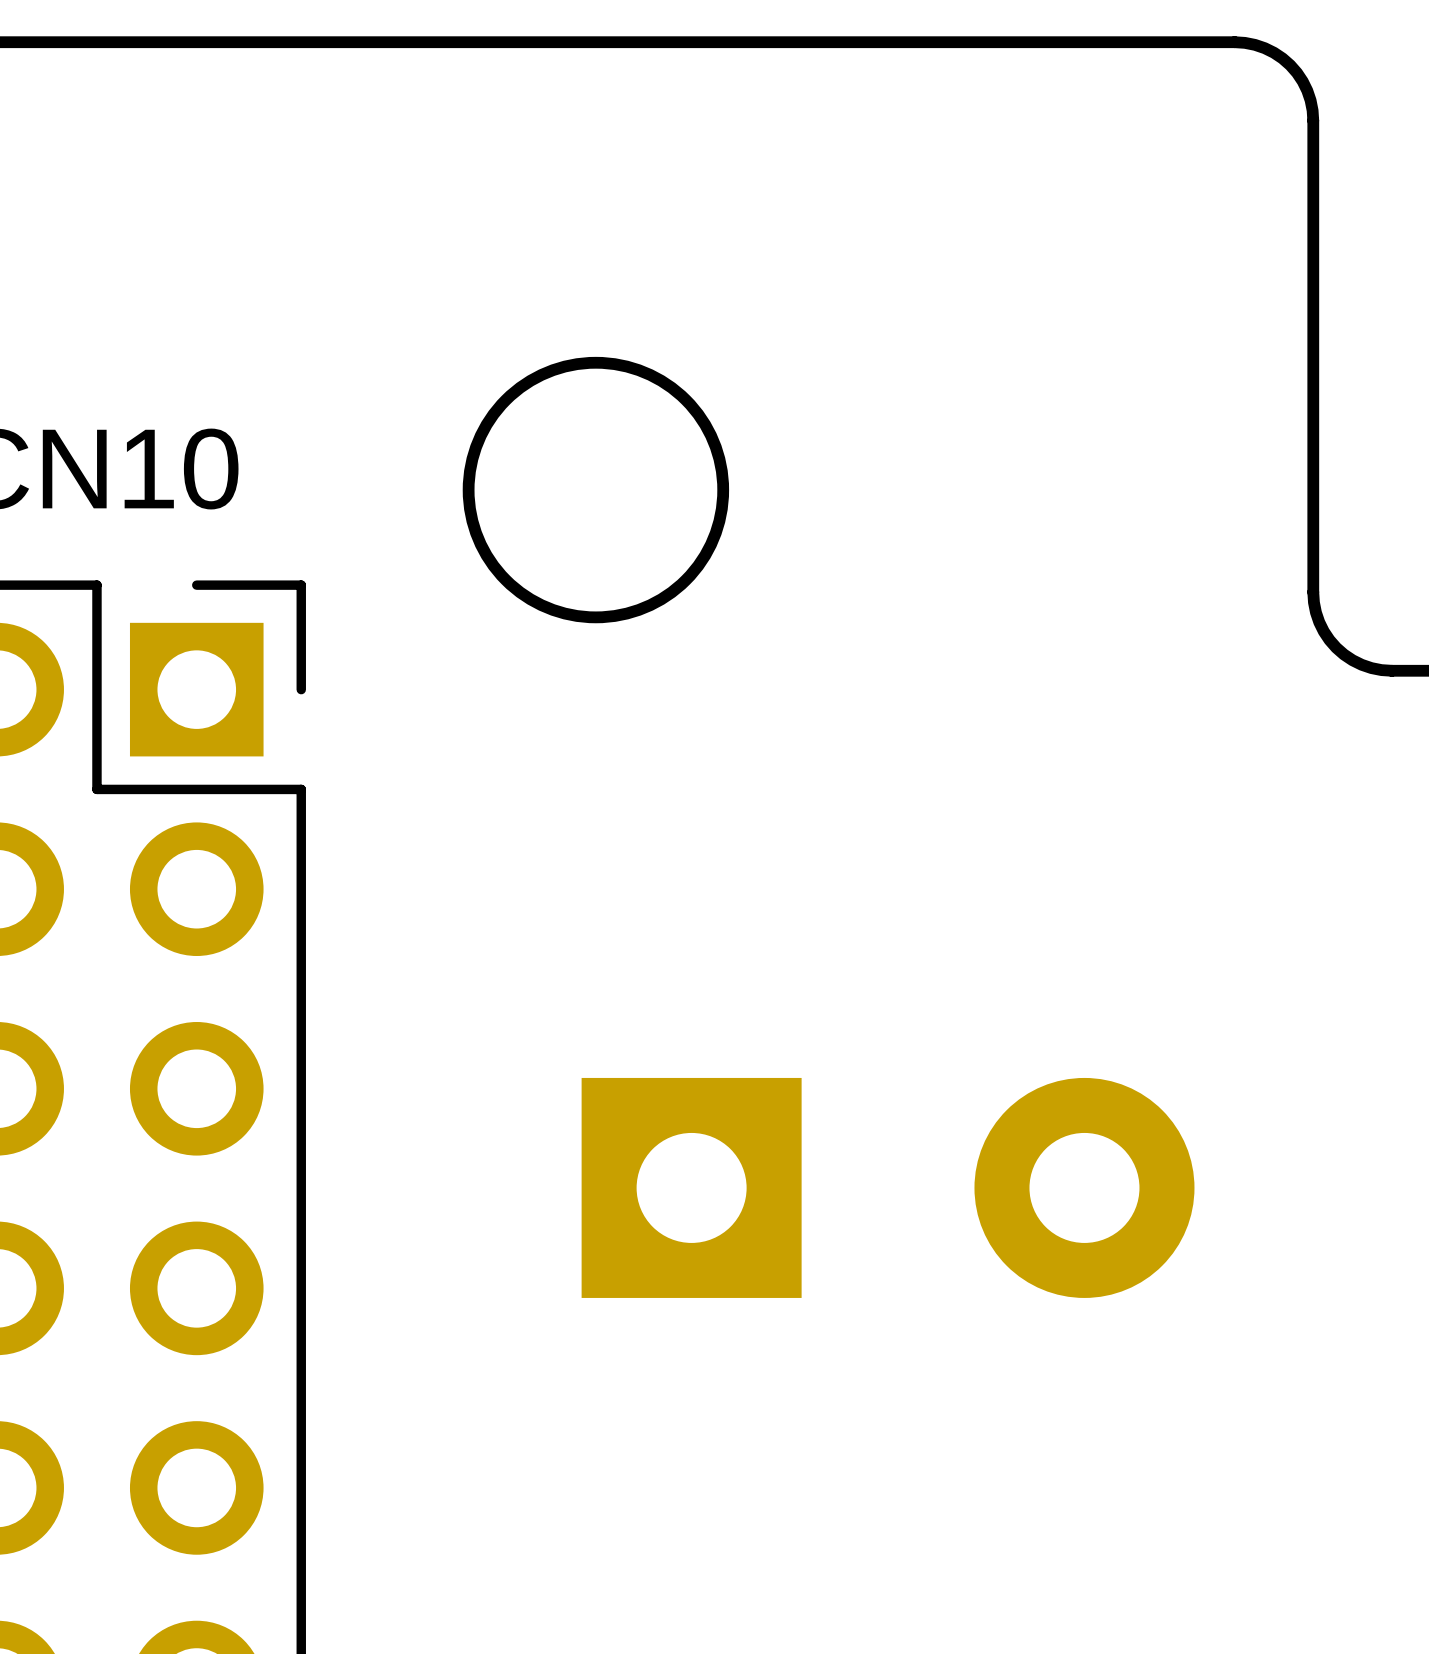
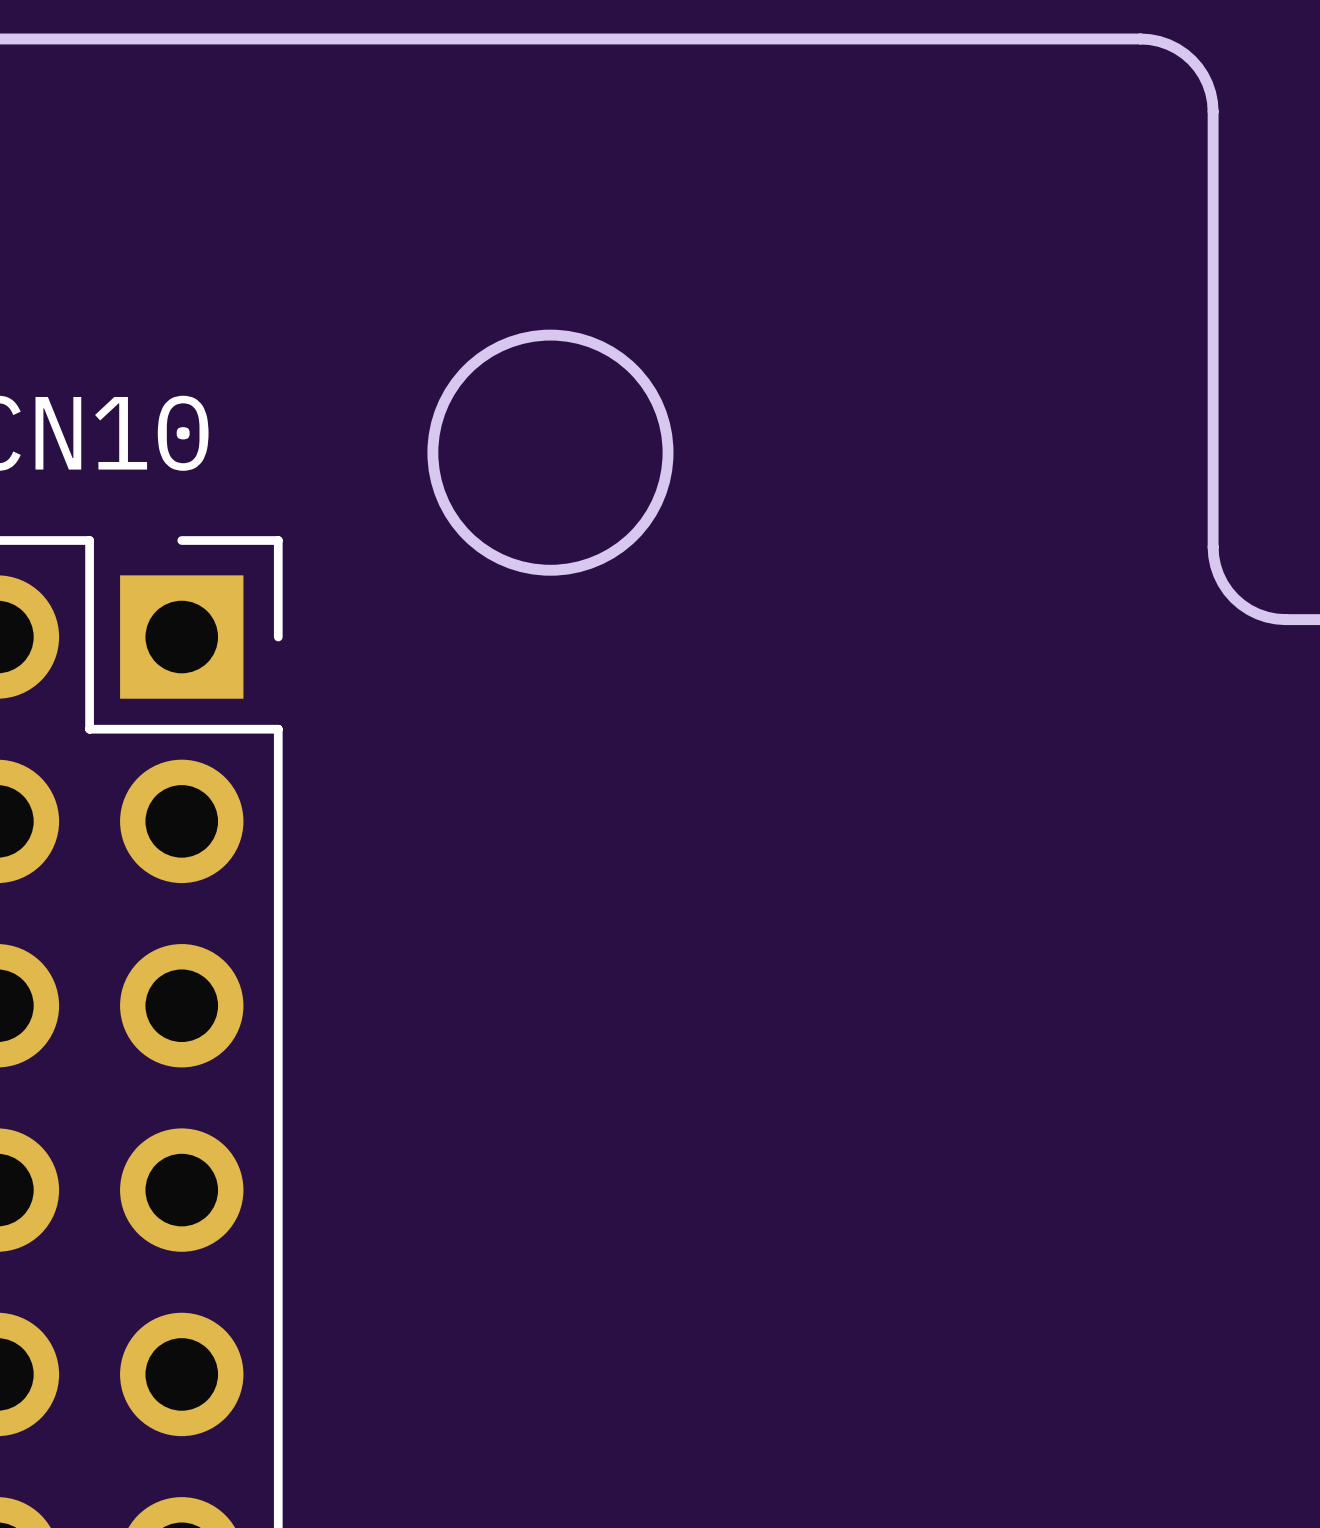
part: (888, 1187) -> none

